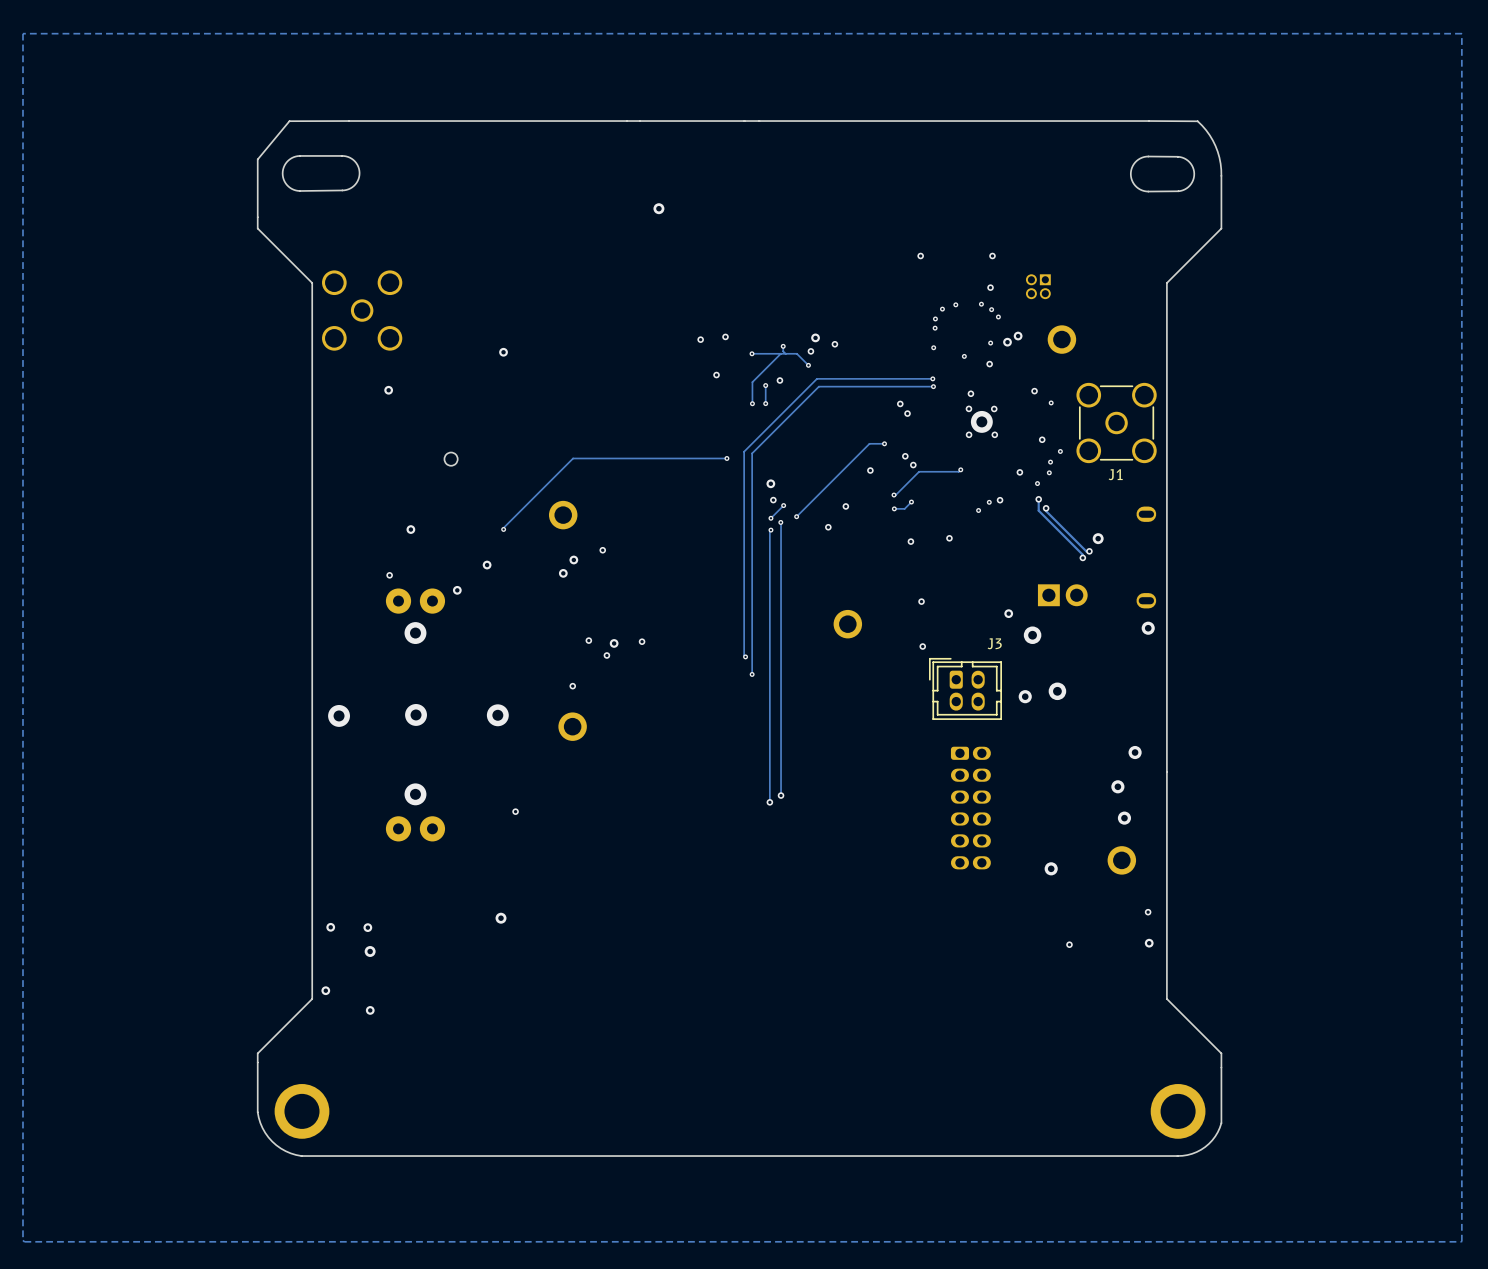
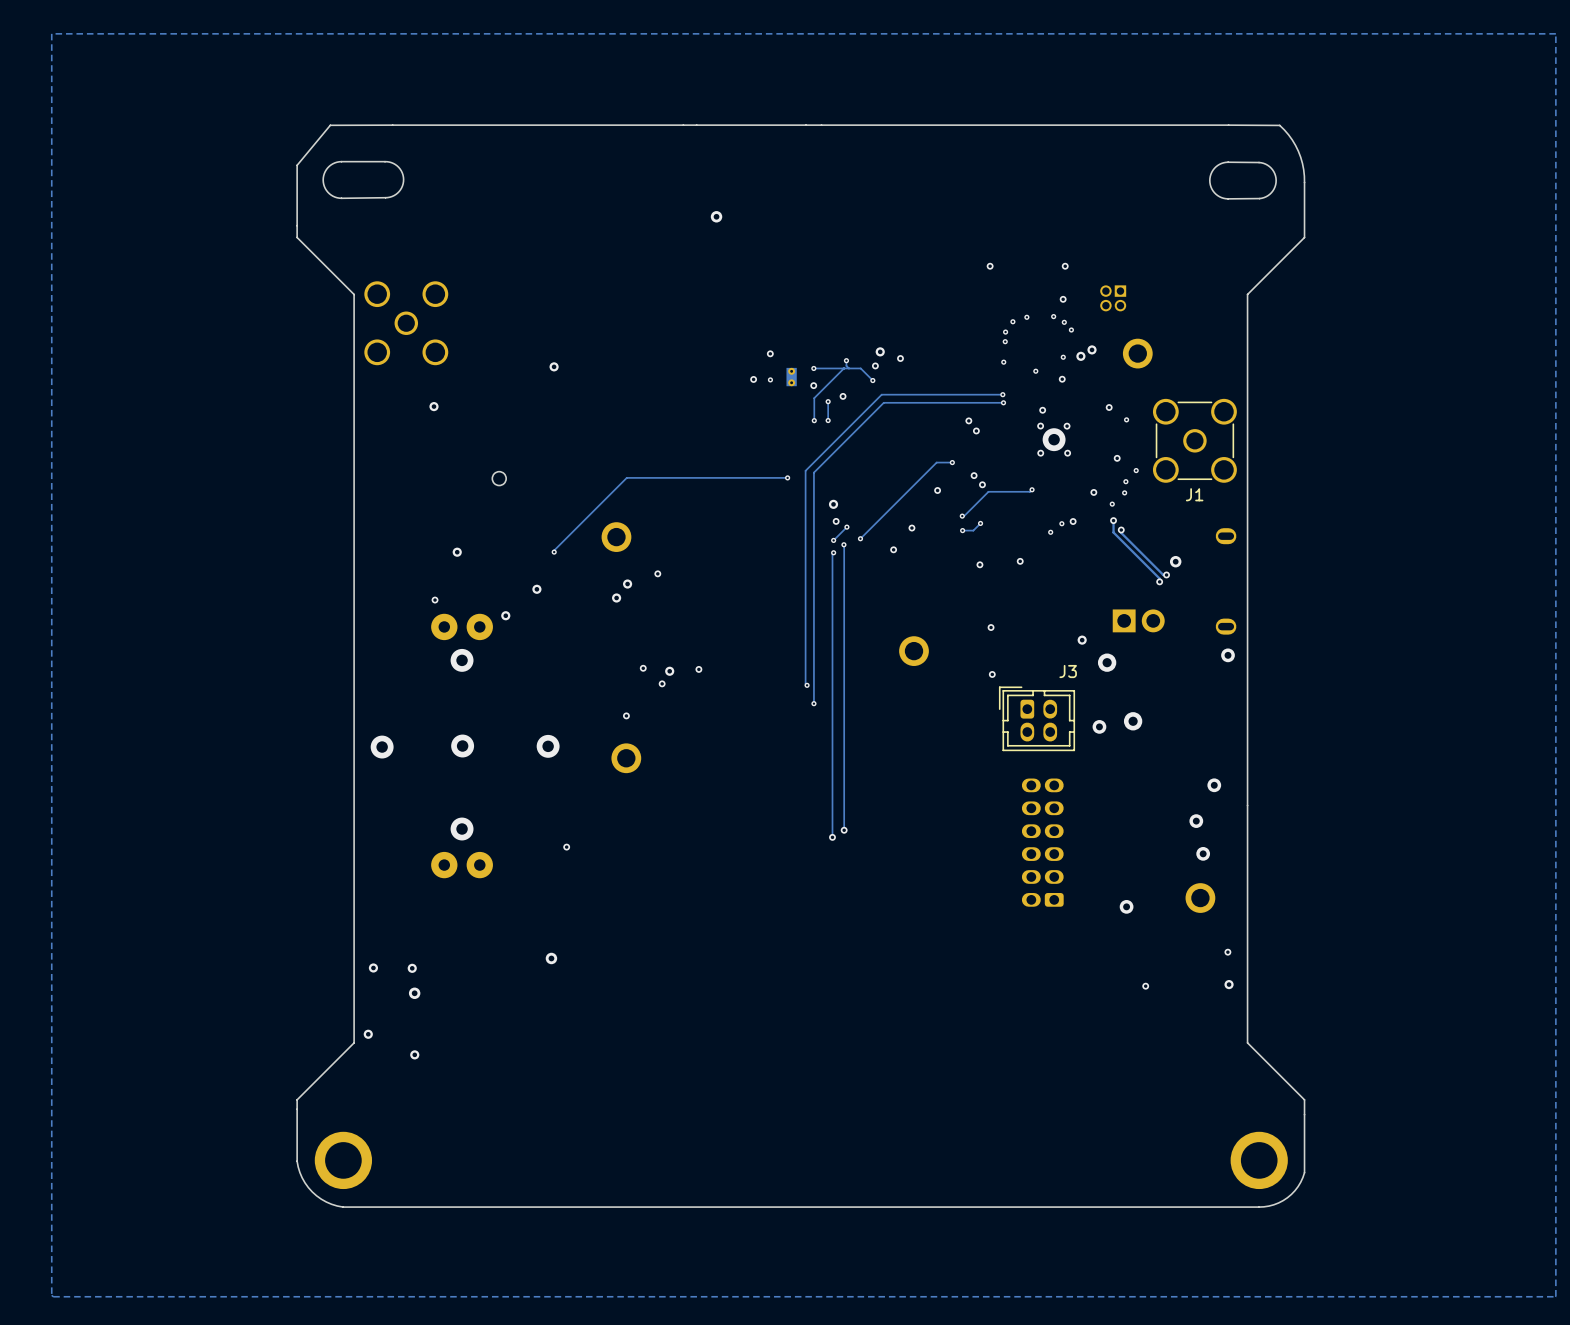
via: (725, 336) -> none
via: (700, 339) -> none
via: none -> (770, 353)
part: none -> (791, 377)
via: none -> (753, 379)
via: none -> (770, 379)
via: none -> (813, 385)
via: (716, 375) -> none
part rotation: 0° (970, 808) -> 180° (1042, 842)

